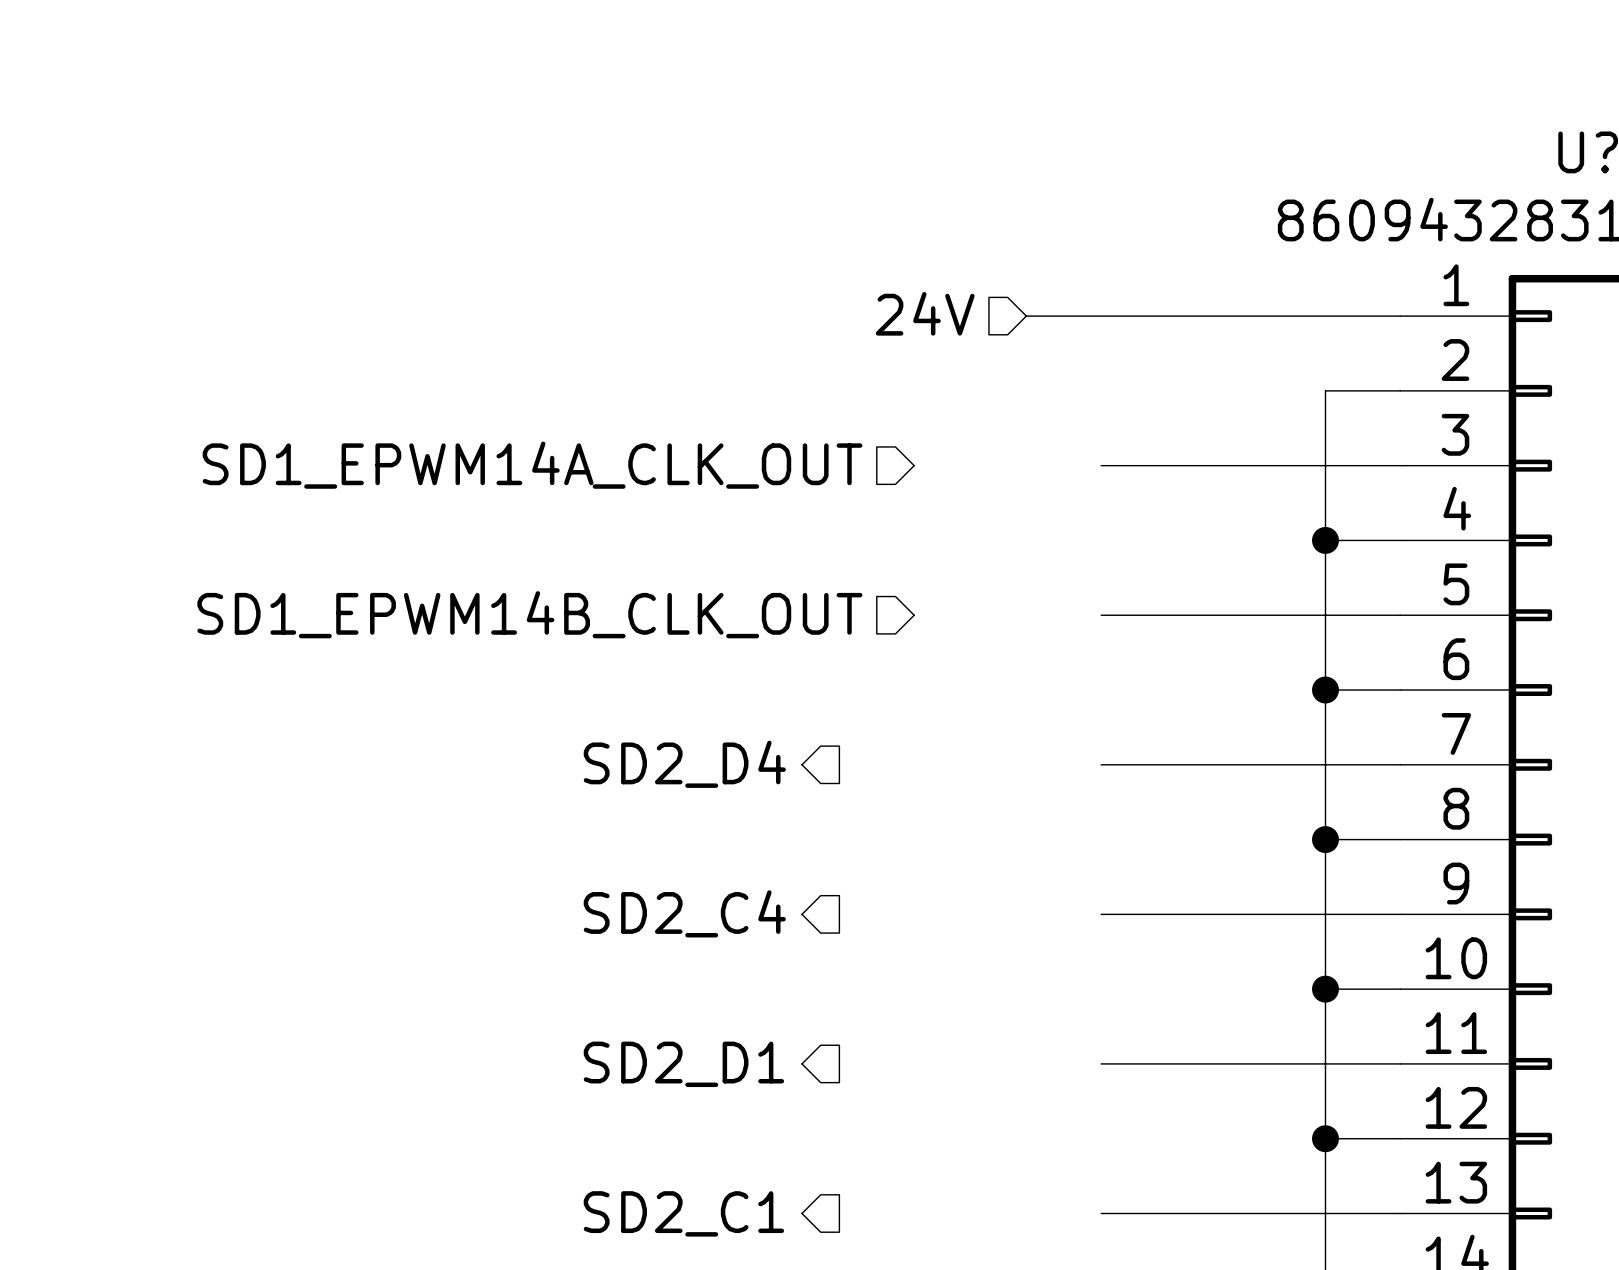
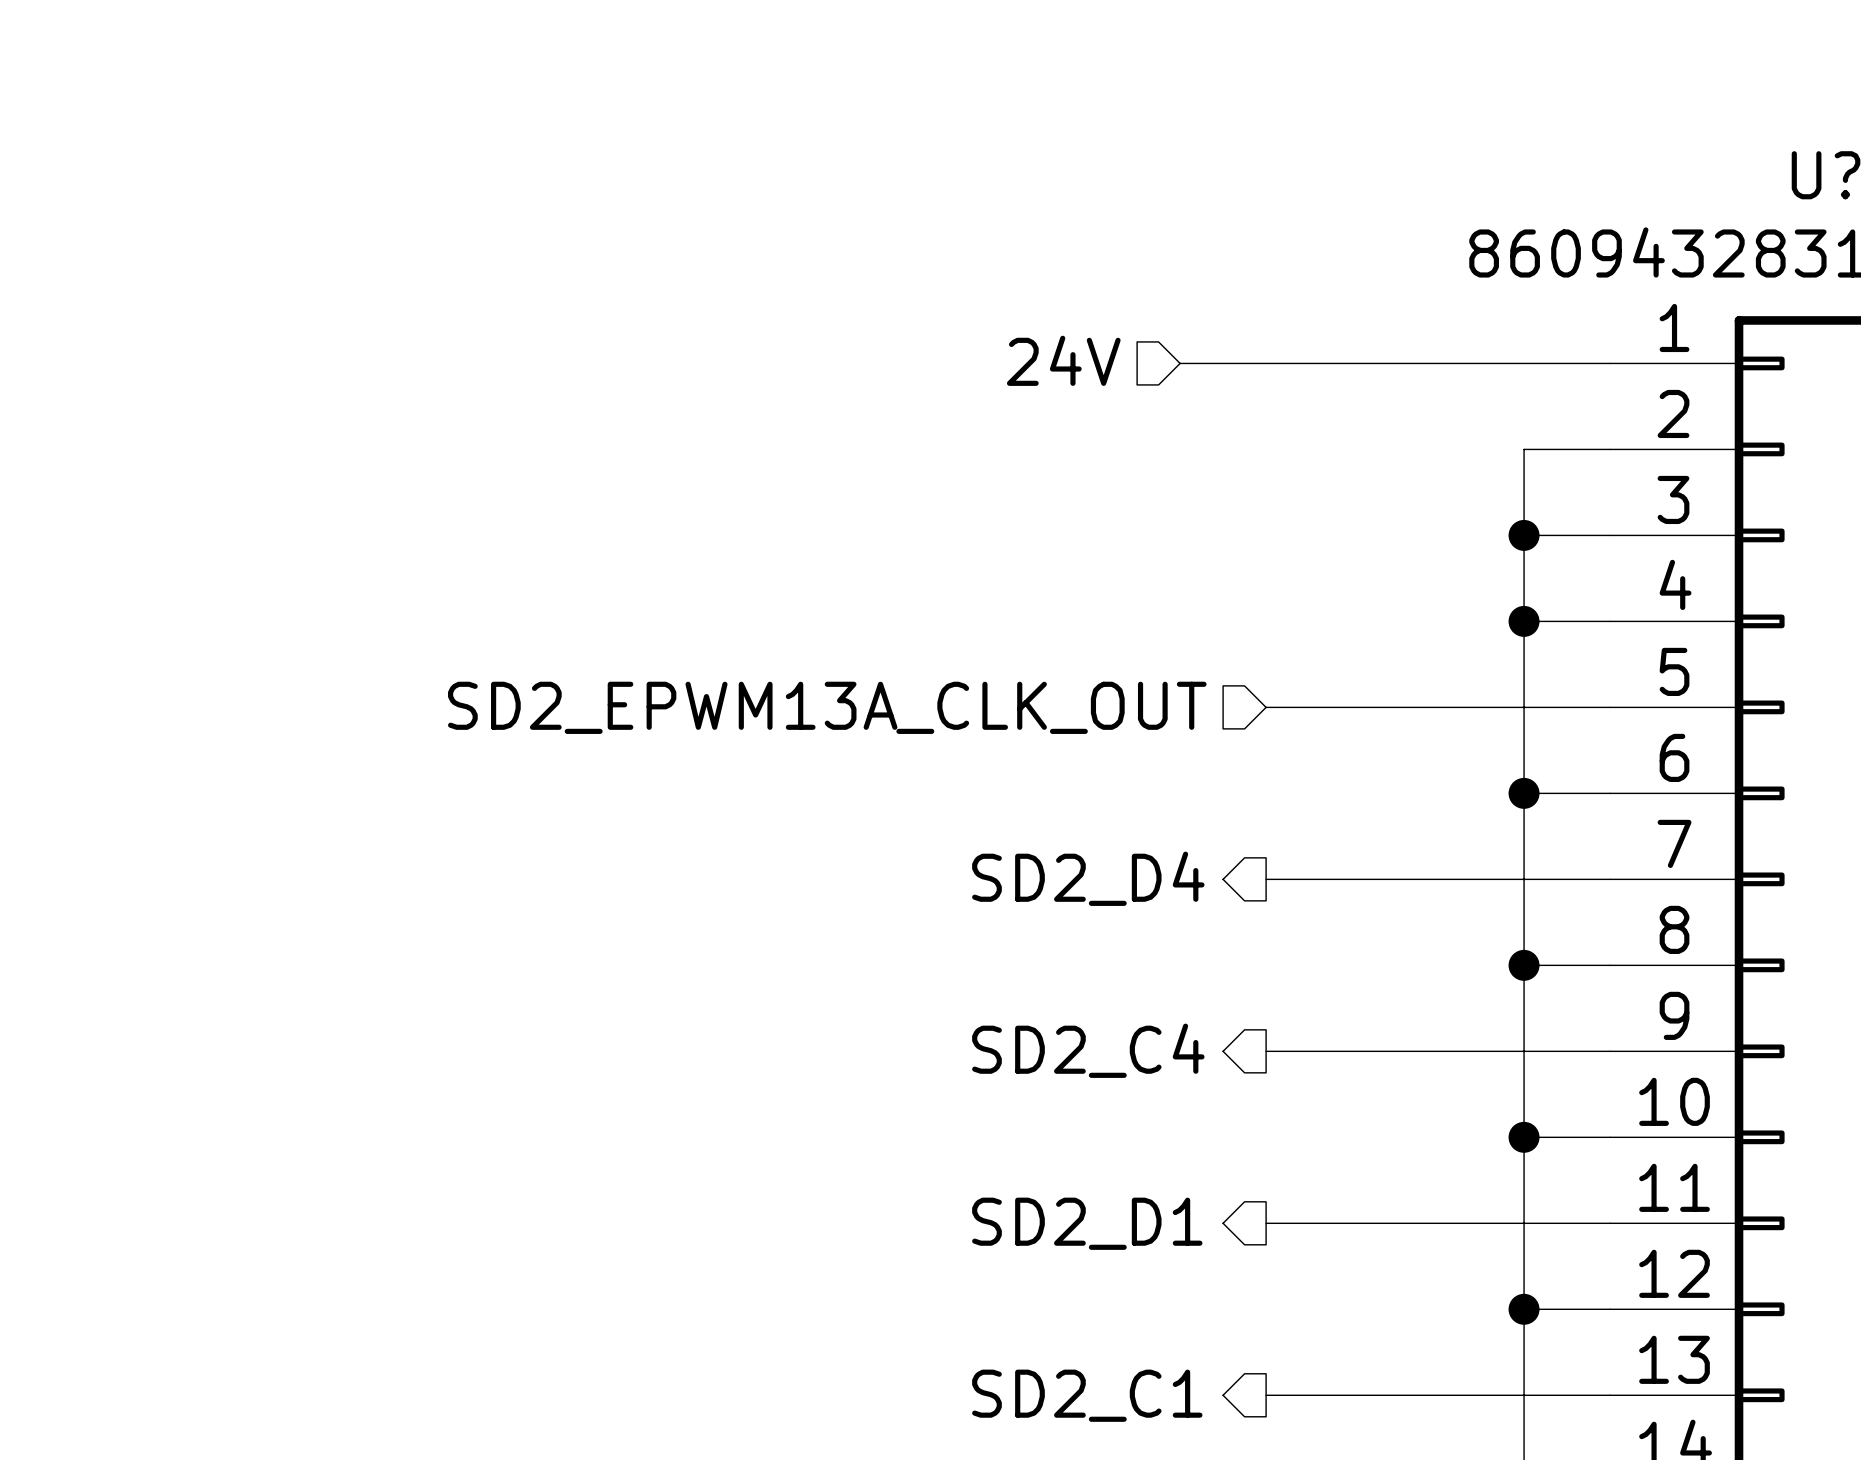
hierarchical label: SD1_EPWM14A_CLK_OUT (532, 465) -> none
wire: (1101, 465) (1325, 465) -> none
junction: none -> (1524, 535)
hierarchical label: SD1_EPWM14B_CLK_OUT (529, 614) -> SD2_EPWM13A_CLK_OUT (827, 707)
hierarchical label position: SD2_D4 (684, 764) -> SD2_D4 (1088, 878)
hierarchical label position: SD2_C4 (684, 913) -> SD2_C4 (1088, 1050)
hierarchical label position: SD2_D1 (683, 1064) -> SD2_D1 (1087, 1223)
hierarchical label position: SD2_C1 (683, 1213) -> SD2_C1 (1087, 1395)

